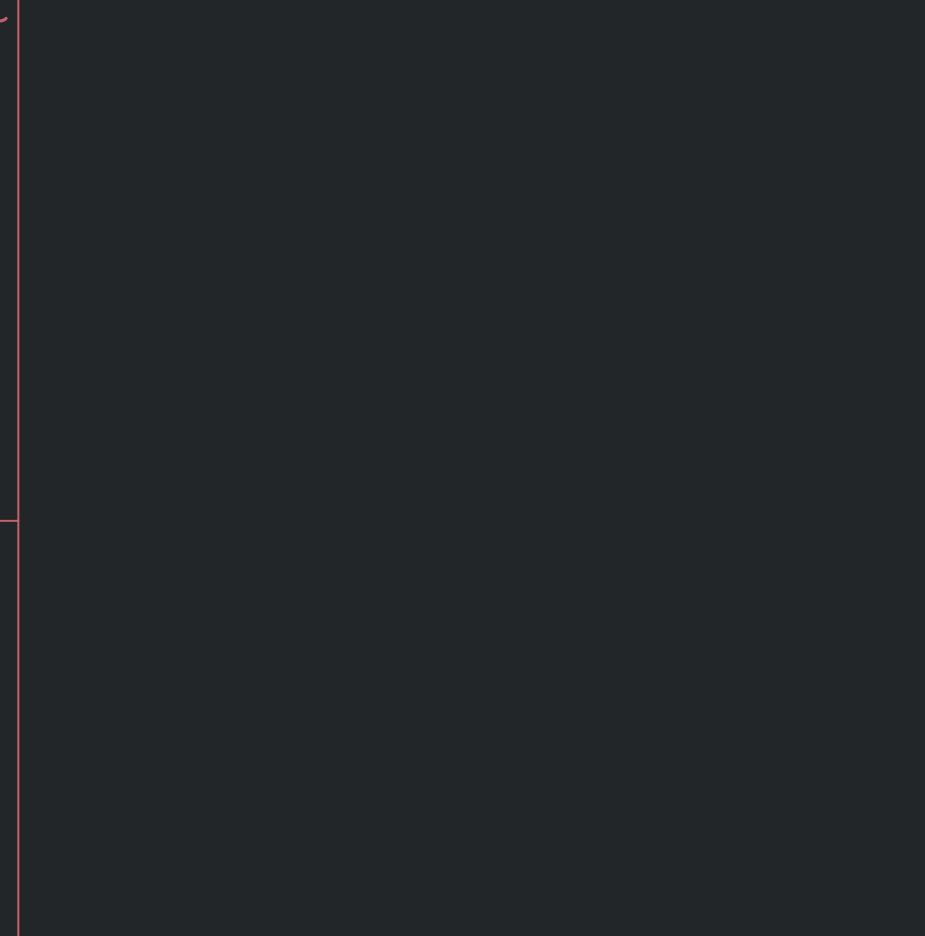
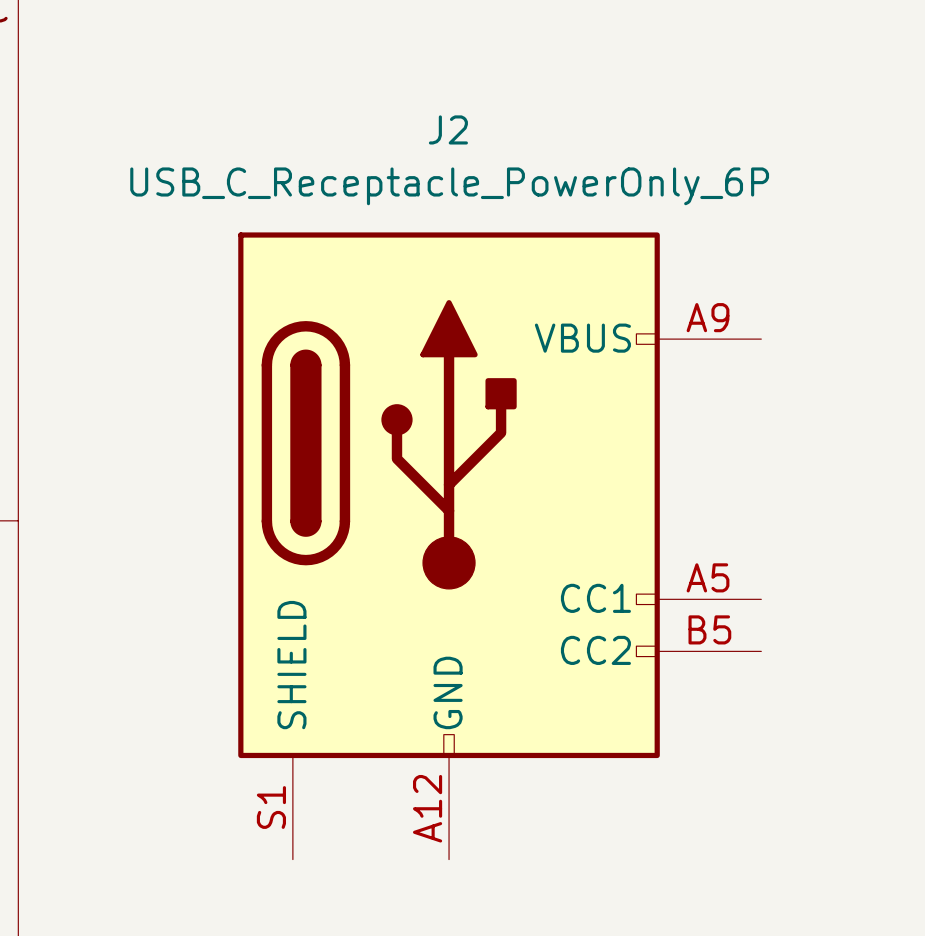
J2: none -> USB_C_Receptacle_PowerOnly_6P (499, 545)

